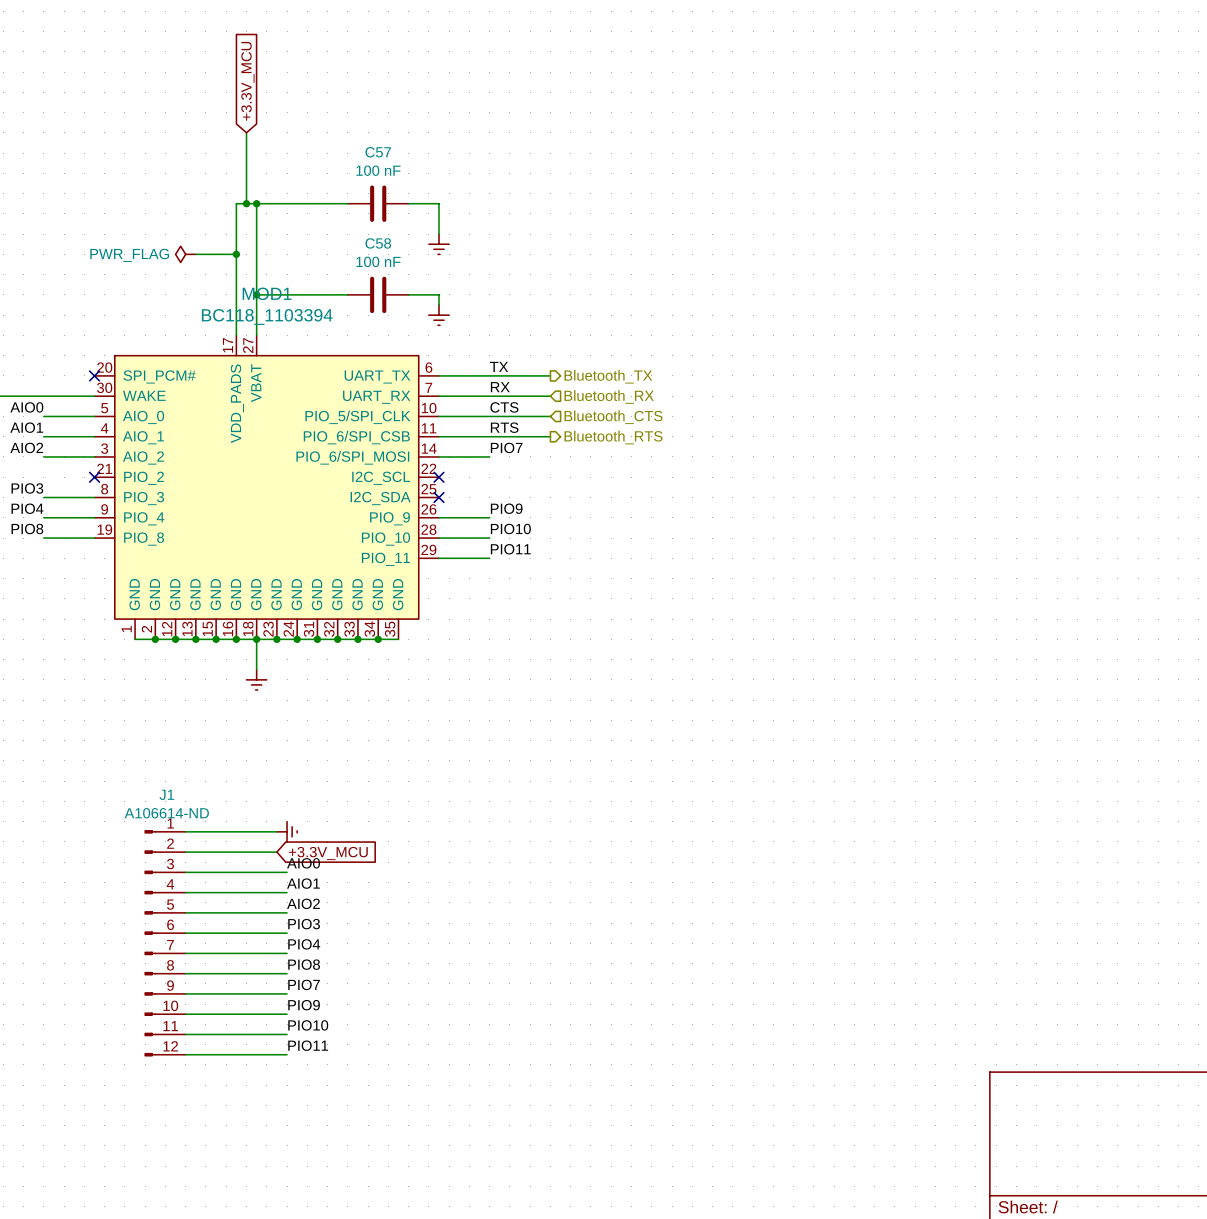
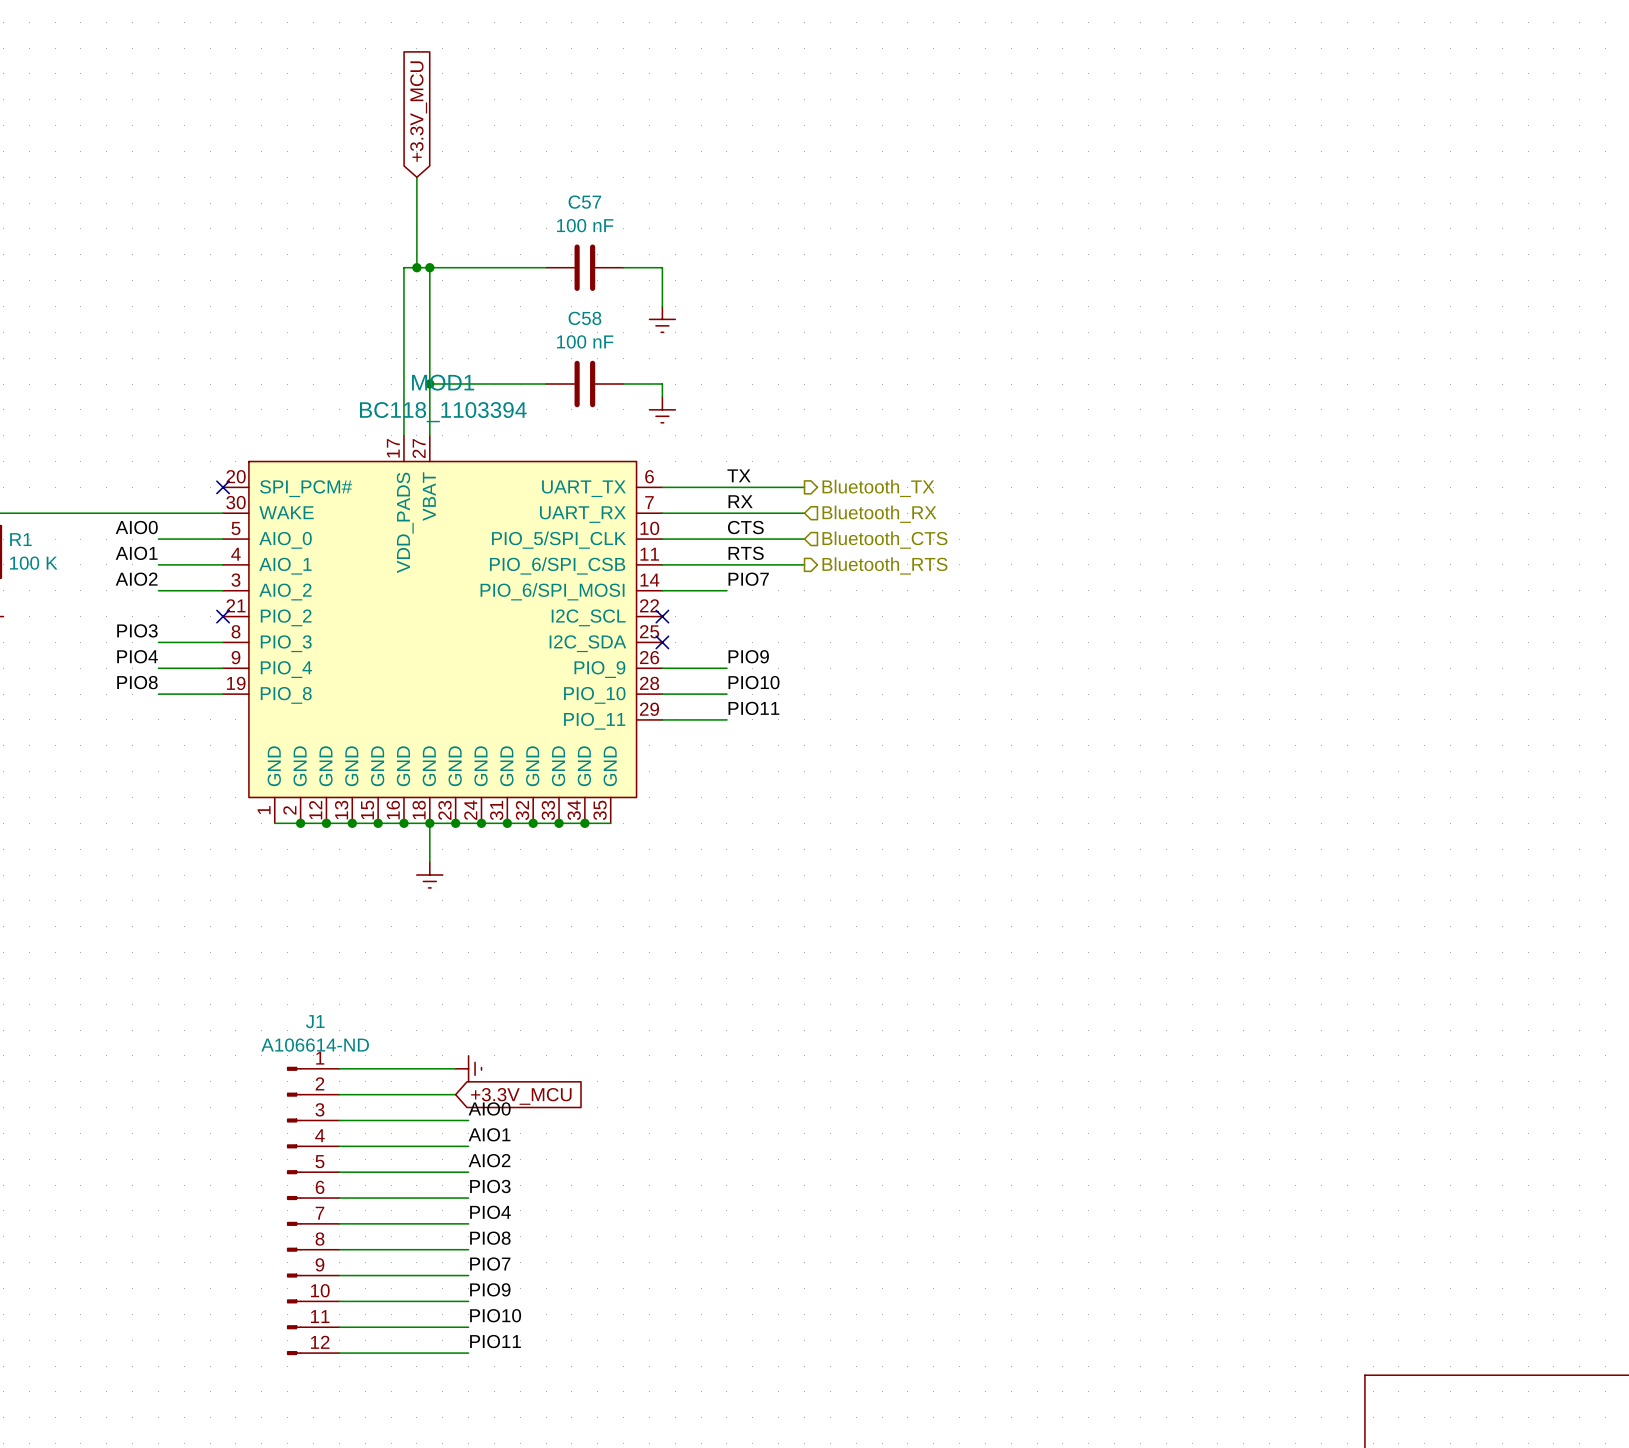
power symbol: PWR_FLAG (185, 254) -> none
wire: (195, 254) (236, 254) -> none
junction: (236, 254) -> none

